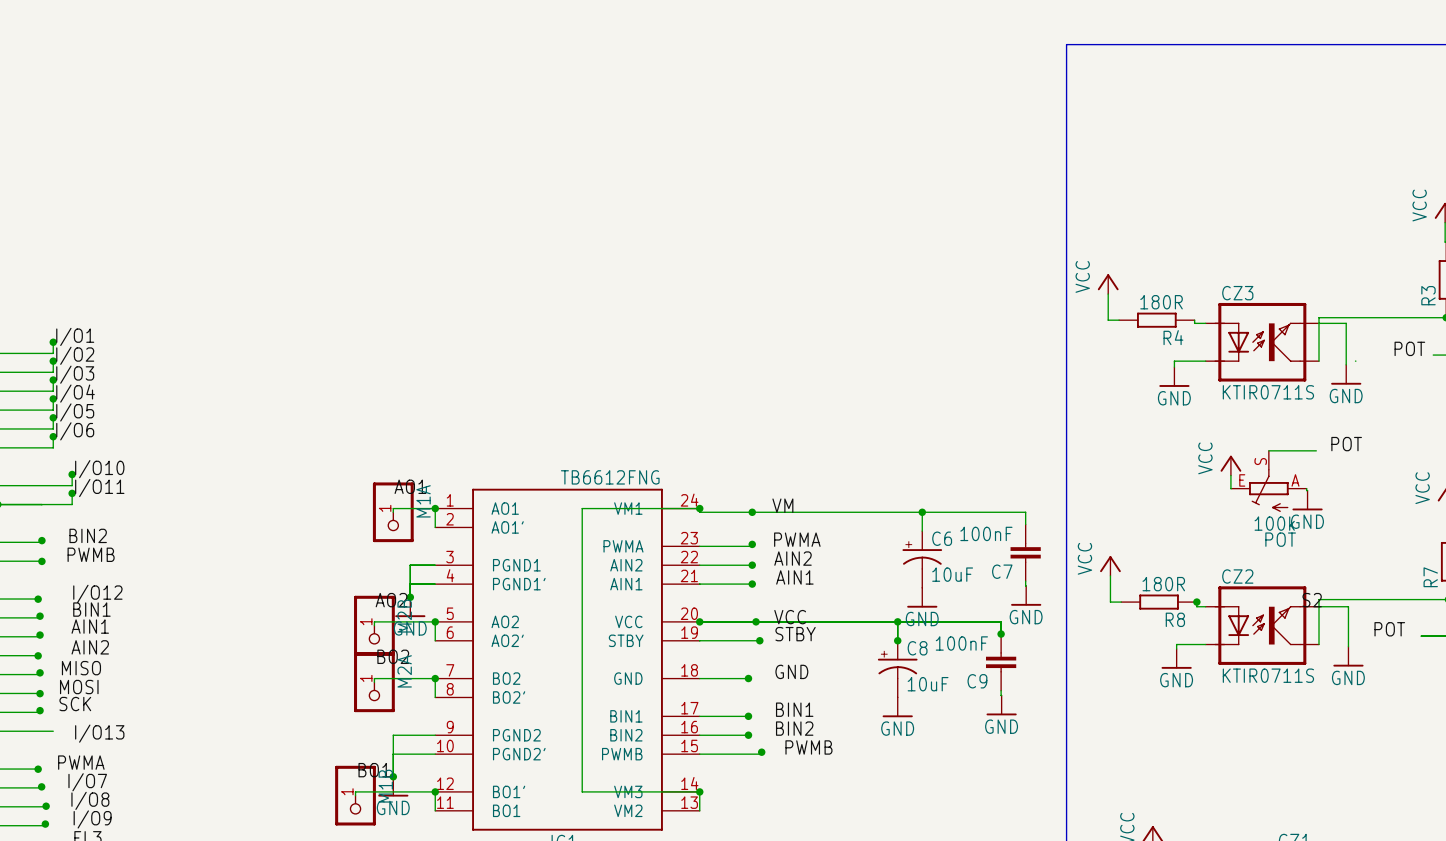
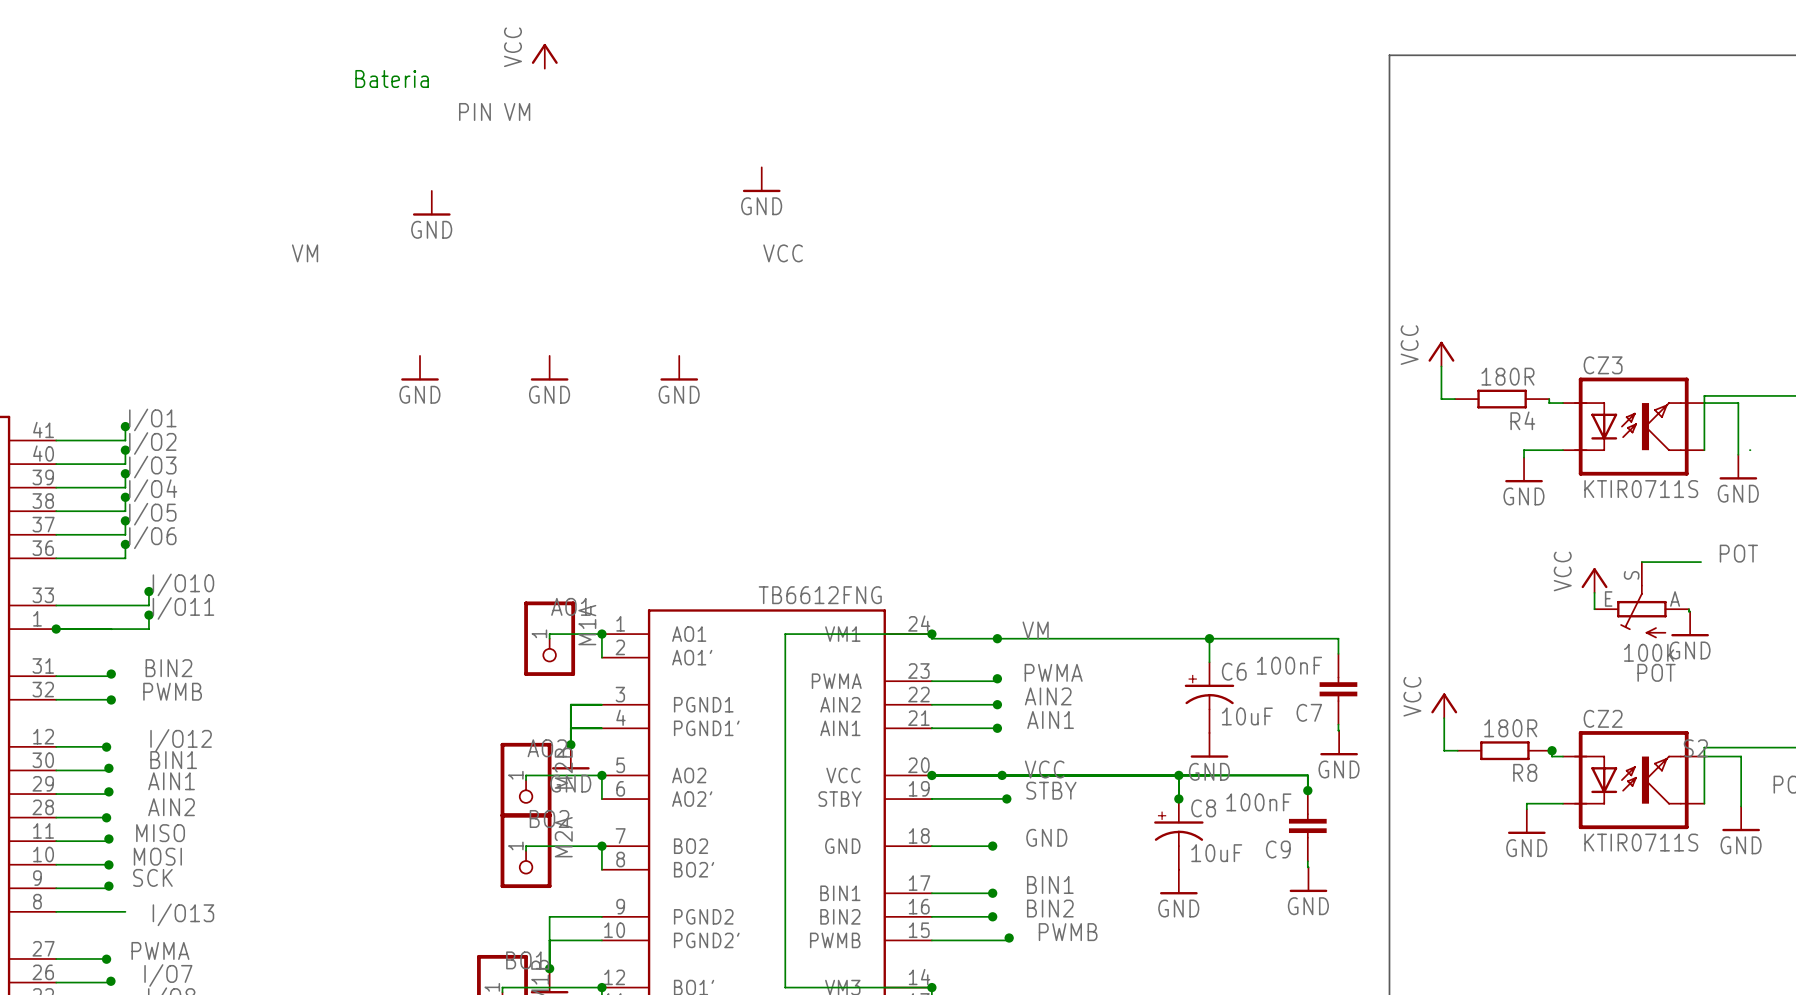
power symbol: none -> VCC (544, 56)
text: none -> Bateria (392, 78)
label: none -> PIN (474, 111)
label: none -> VM (517, 111)
power symbol: none -> GND (761, 179)
power symbol: none -> GND (431, 203)
label: none -> VM (305, 253)
label: none -> VCC (783, 253)
power symbol: none -> GND (420, 368)
power symbol: none -> GND (549, 368)
power symbol: none -> GND (679, 368)

